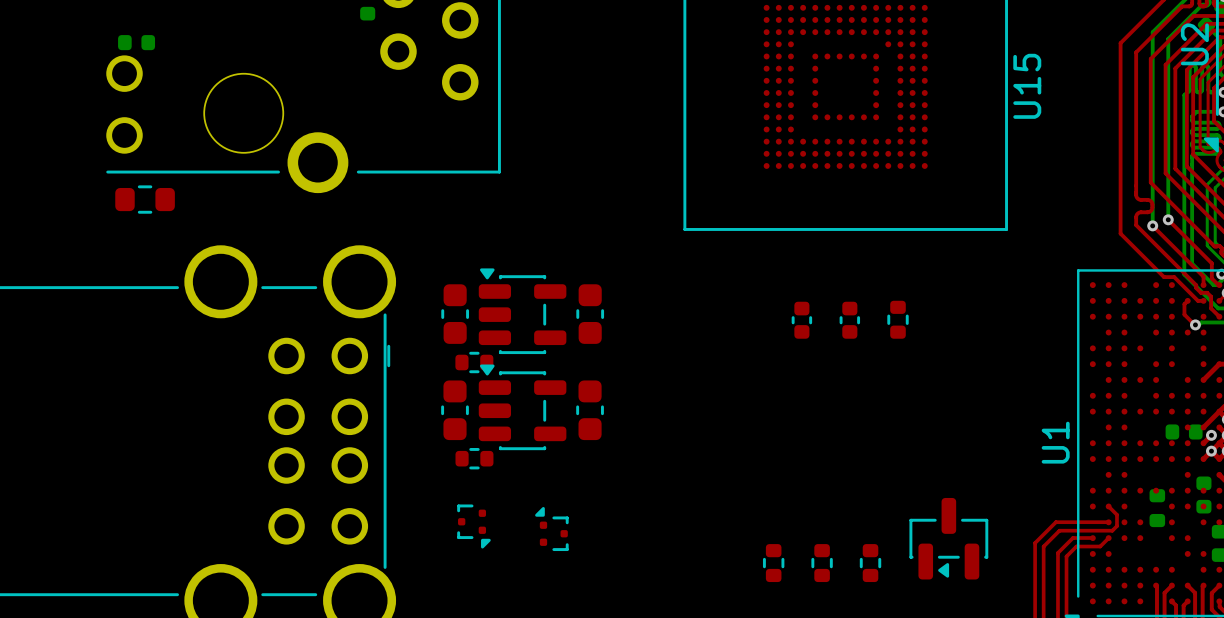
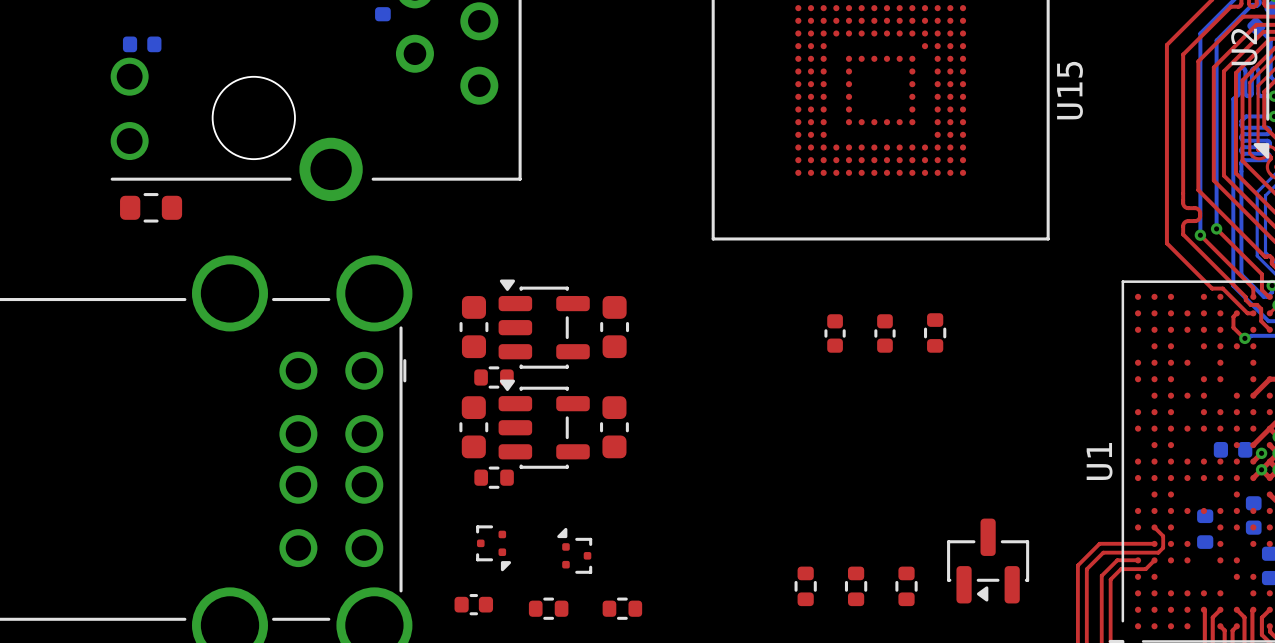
part: none -> (473, 604)
part: none -> (548, 608)
part: none -> (622, 608)

